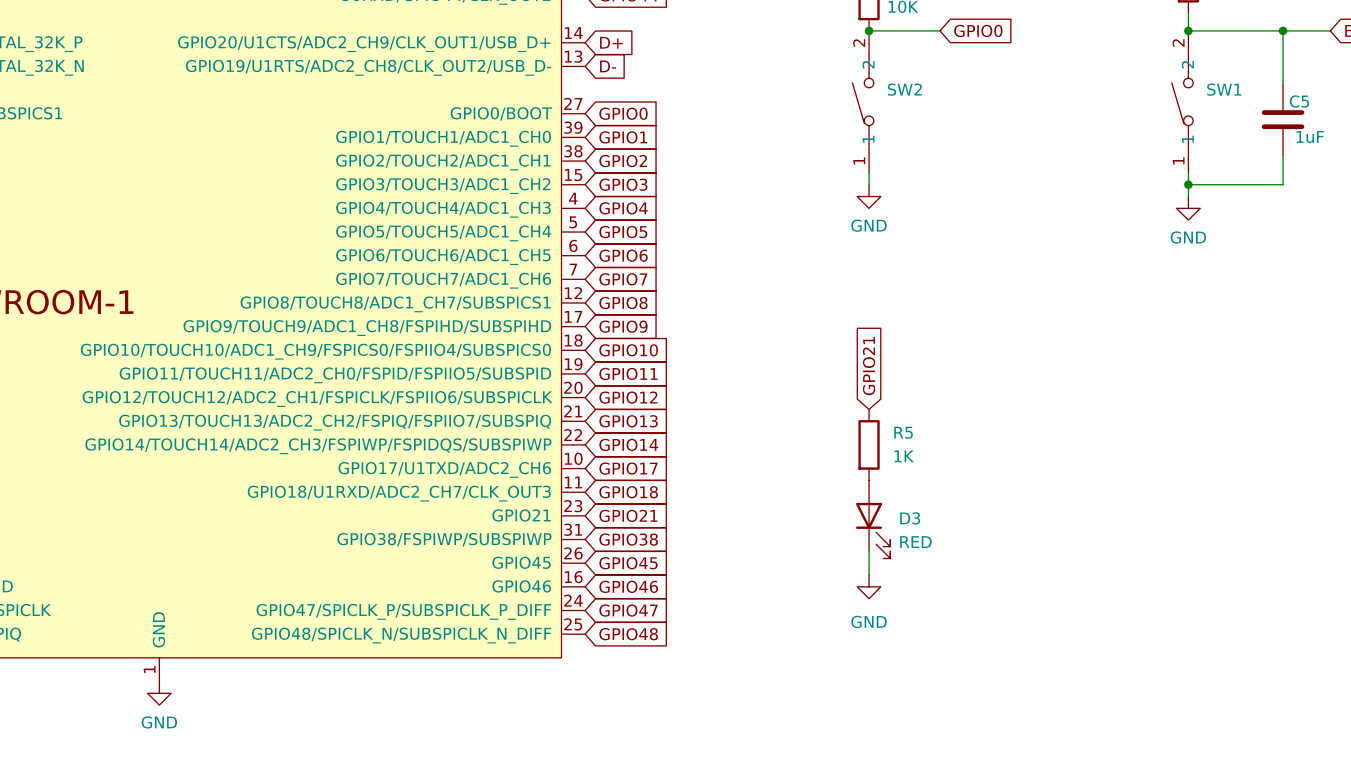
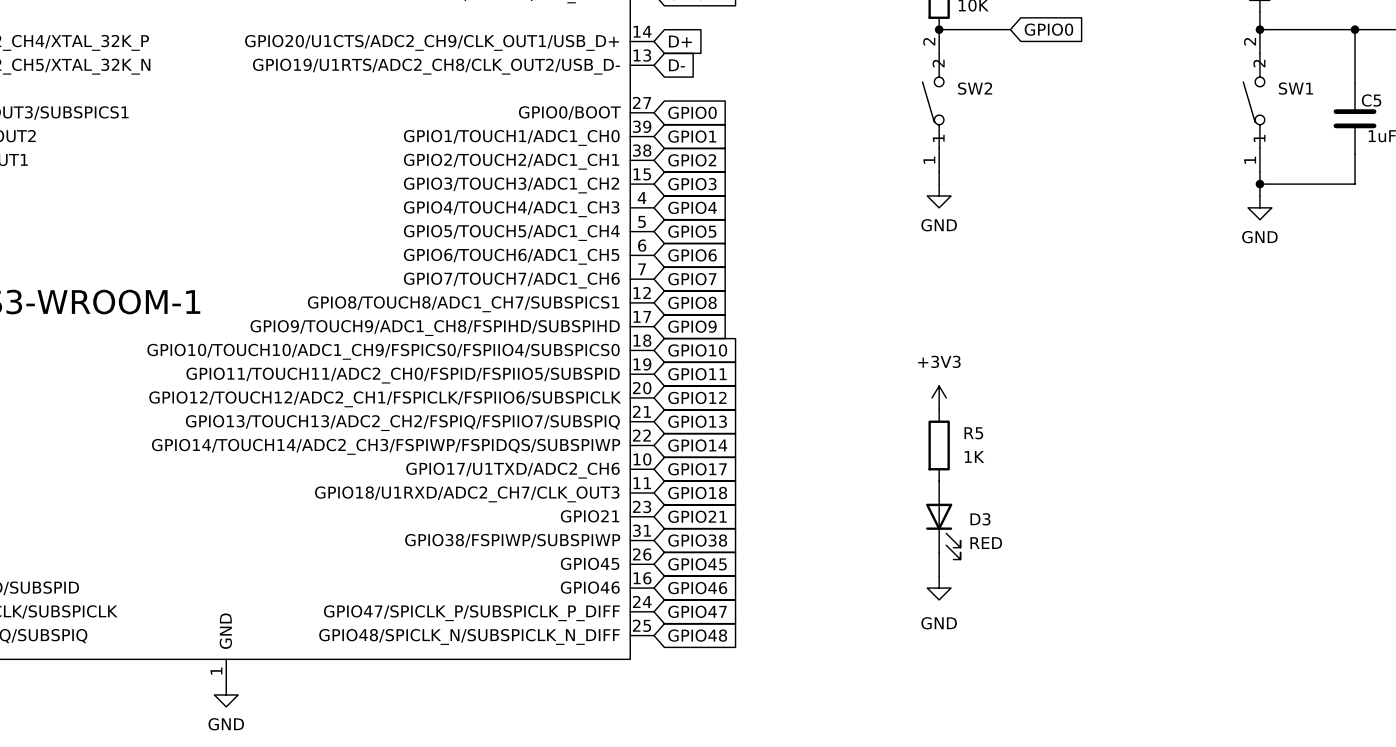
global label: GPIO21 (869, 366) -> none
power symbol: none -> +3V3 (939, 397)

